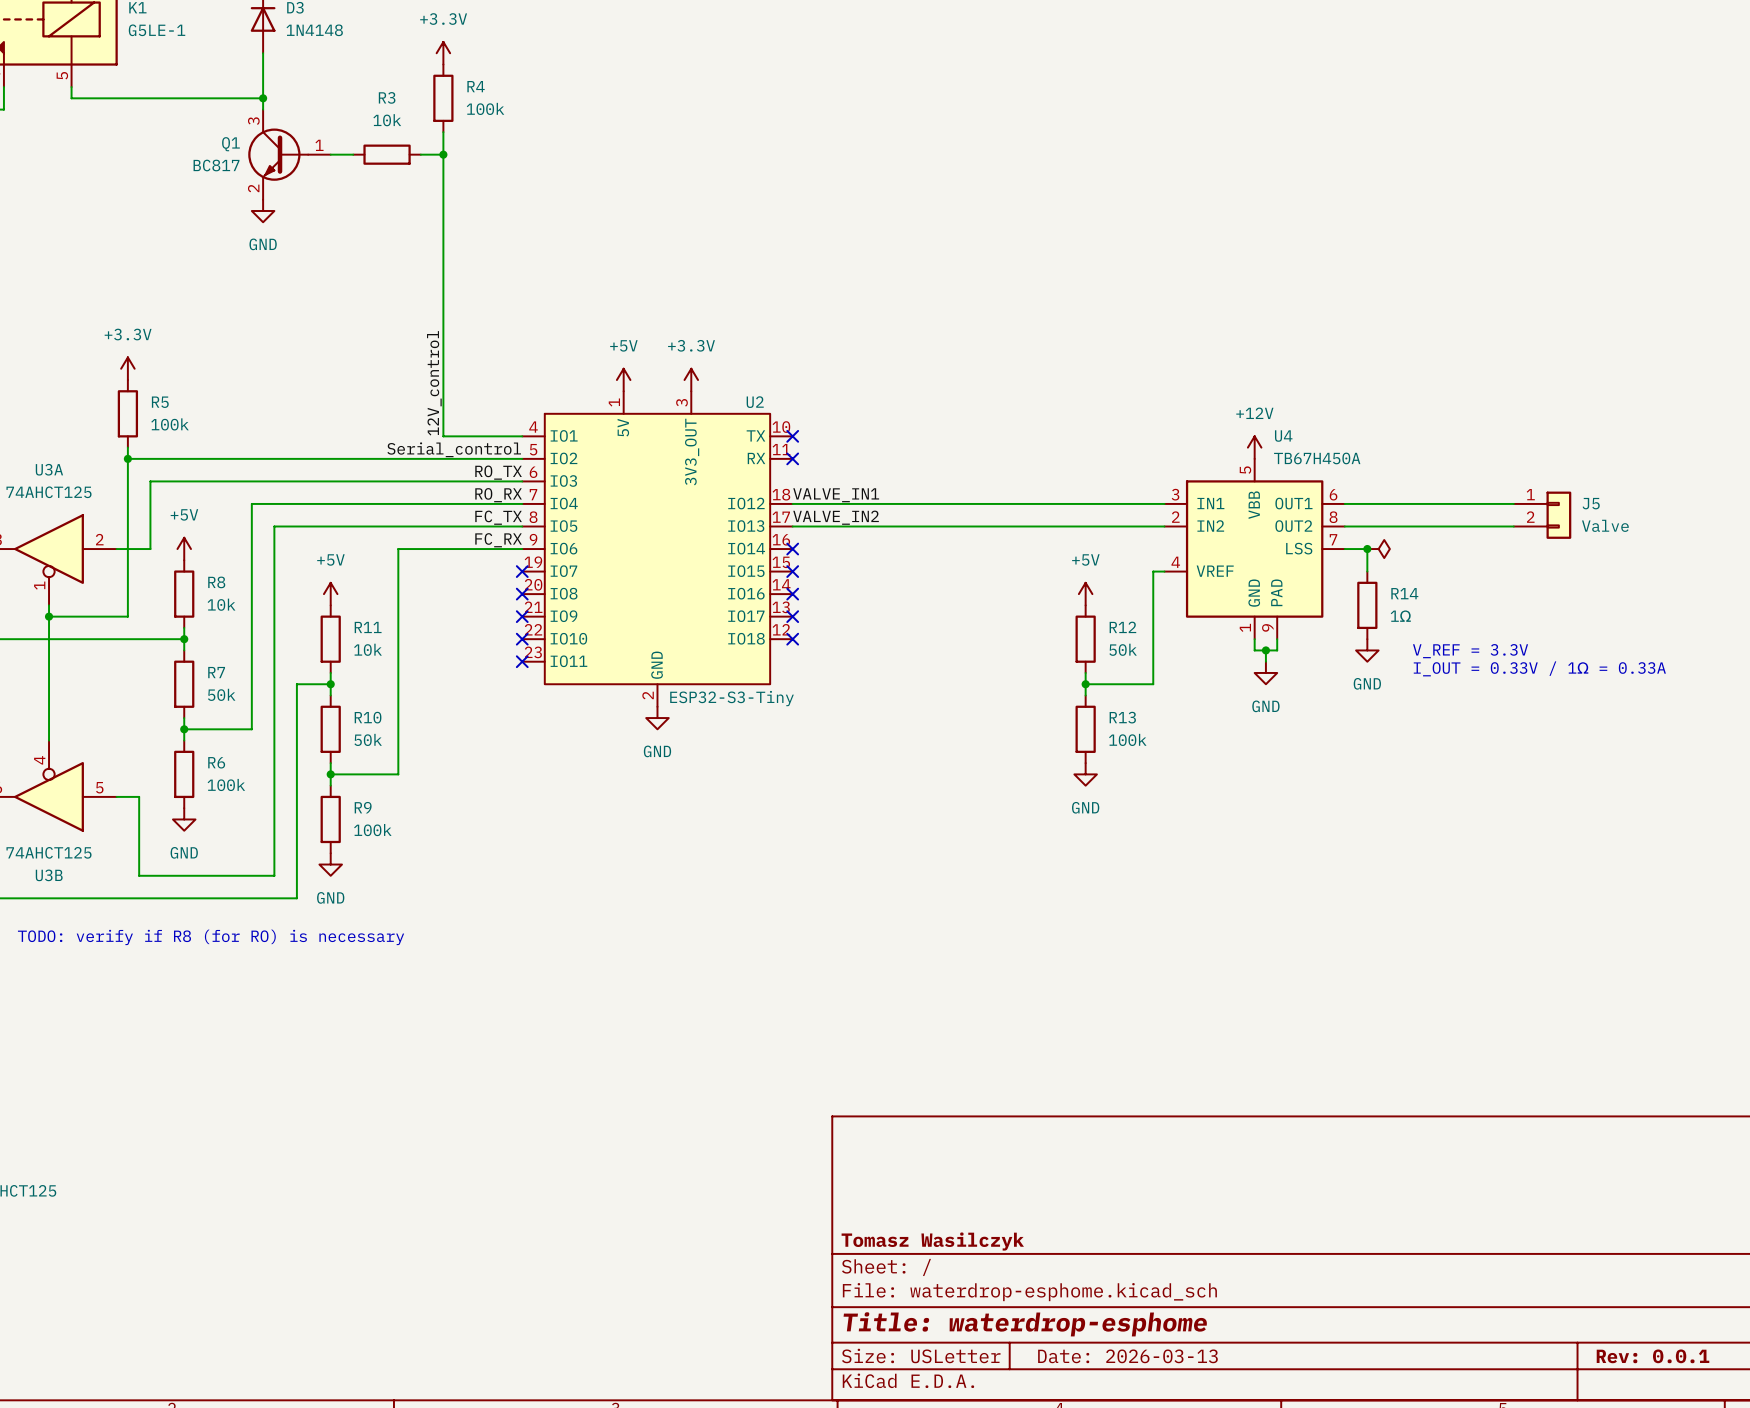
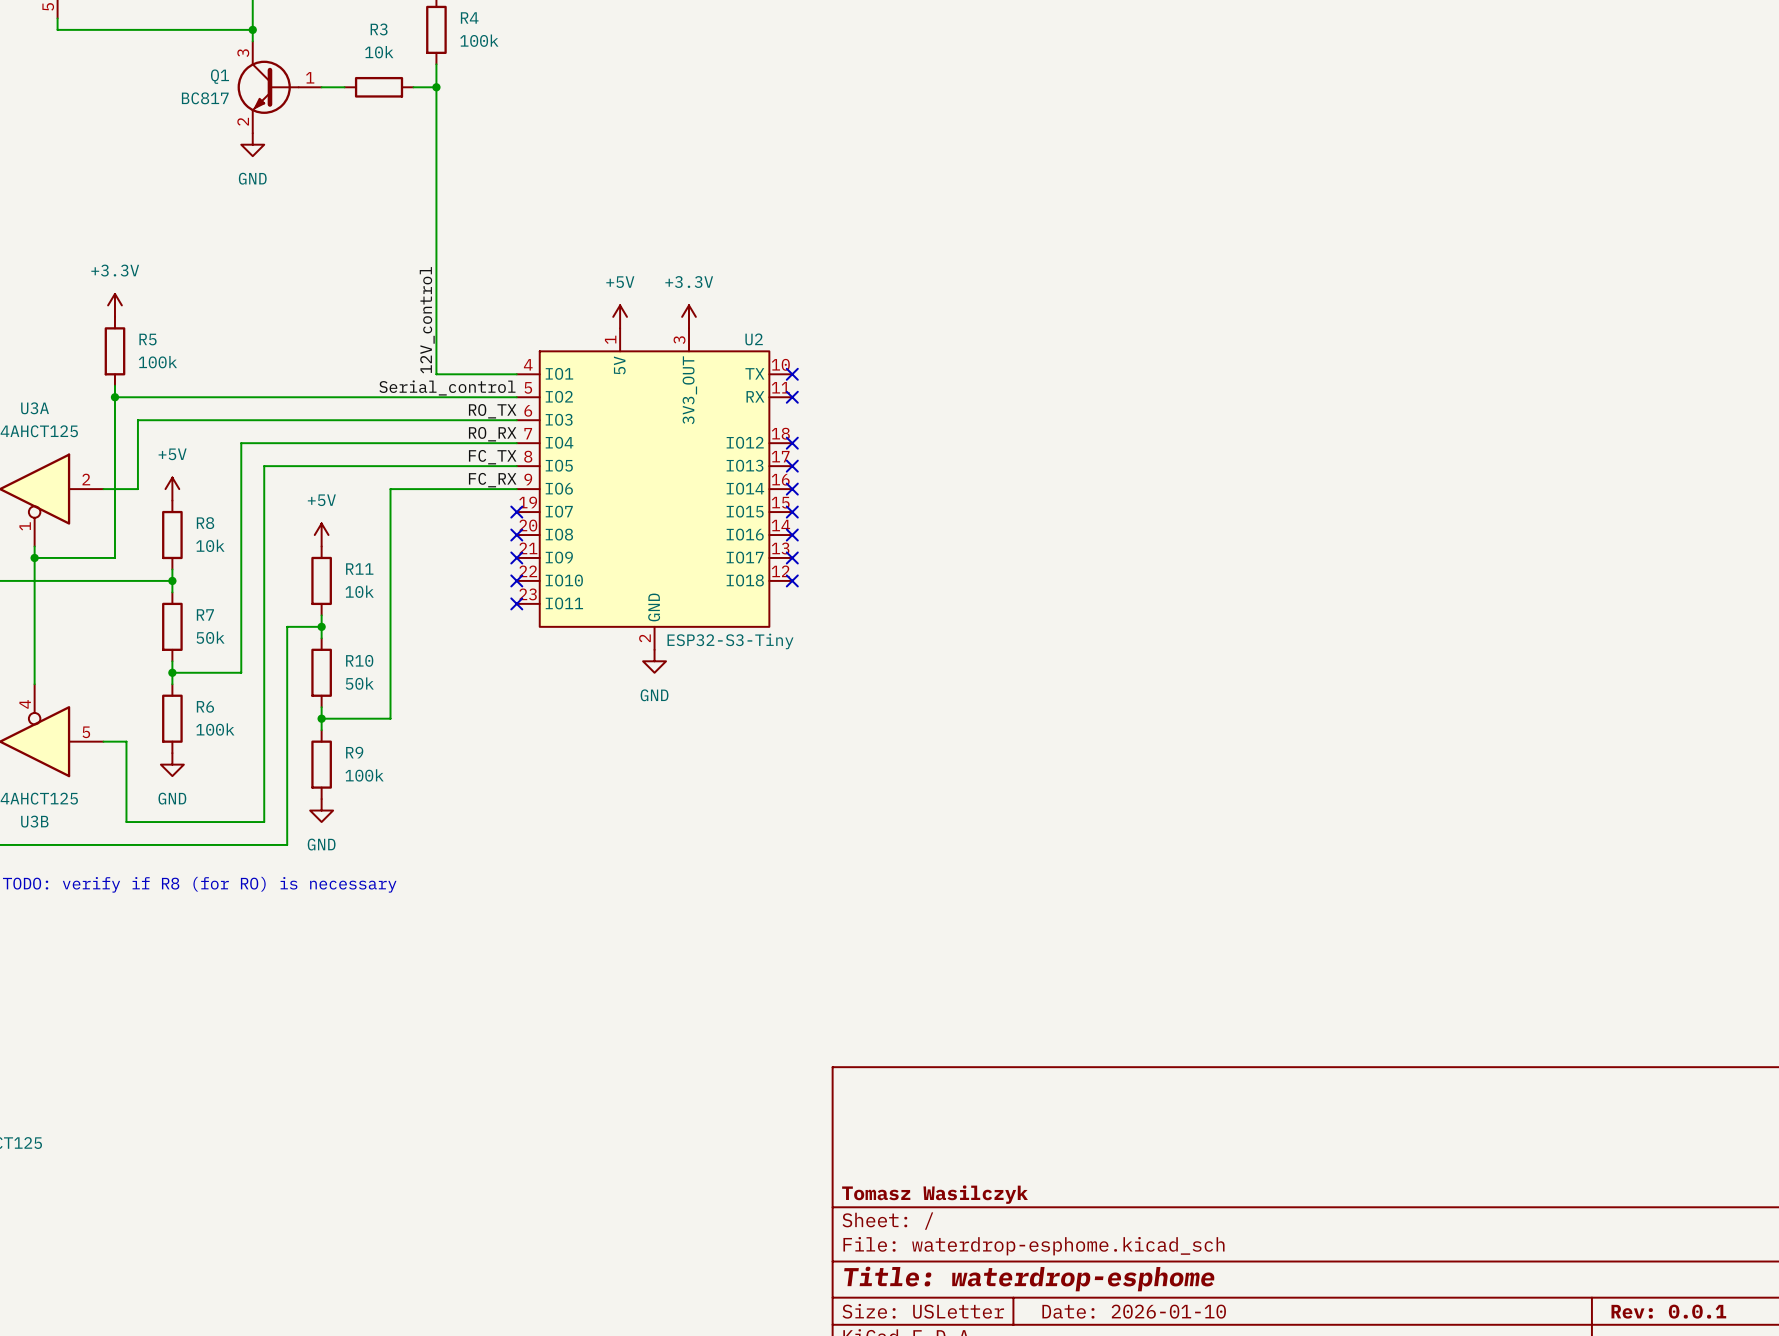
power symbol: +12V (1254, 447) -> none
label: VALVE_IN1 (836, 495) -> none
wire: (792, 503) (1164, 503) -> none
no-connect mark: none -> (792, 443)
wire: (1344, 503) (1513, 503) -> none
J5: Valve (1542, 515) -> none
label: VALVE_IN2 (836, 517) -> none
wire: (792, 526) (1164, 526) -> none
no-connect mark: none -> (792, 466)
wire: (1344, 526) (1513, 526) -> none
U4: TB67H450A (1254, 549) -> none
wire: (1344, 549) (1367, 549) (1367, 571) -> none
junction: (1367, 549) -> none
power symbol: (1378, 549) -> none
wire: (1164, 571) (1153, 571) (1153, 684) (1085, 684) -> none
power symbol: +5V (1085, 594) -> none
R14: 1Ω (1367, 605) -> none
R12: 50k (1085, 639) -> none
wire: (1254, 639) (1254, 650) (1277, 650) (1277, 639) -> none
wire: (1265, 650) (1265, 661) -> none
junction: (1265, 650) -> none
power symbol: GND (1367, 650) -> none
text: V_REF = 3.3V (1470, 651) -> none
text: I_OUT = 0.33V / 1Ω = 0.33A (1539, 668) -> none
wire: (1085, 672) (1085, 695) -> none
power symbol: GND (1265, 672) -> none
junction: (1085, 684) -> none
R13: 100k (1085, 729) -> none
power symbol: GND (1085, 774) -> none
title block: Date: 2026-03-13 (1127, 1356) -> Date: 2026-01-10 (1134, 1311)

